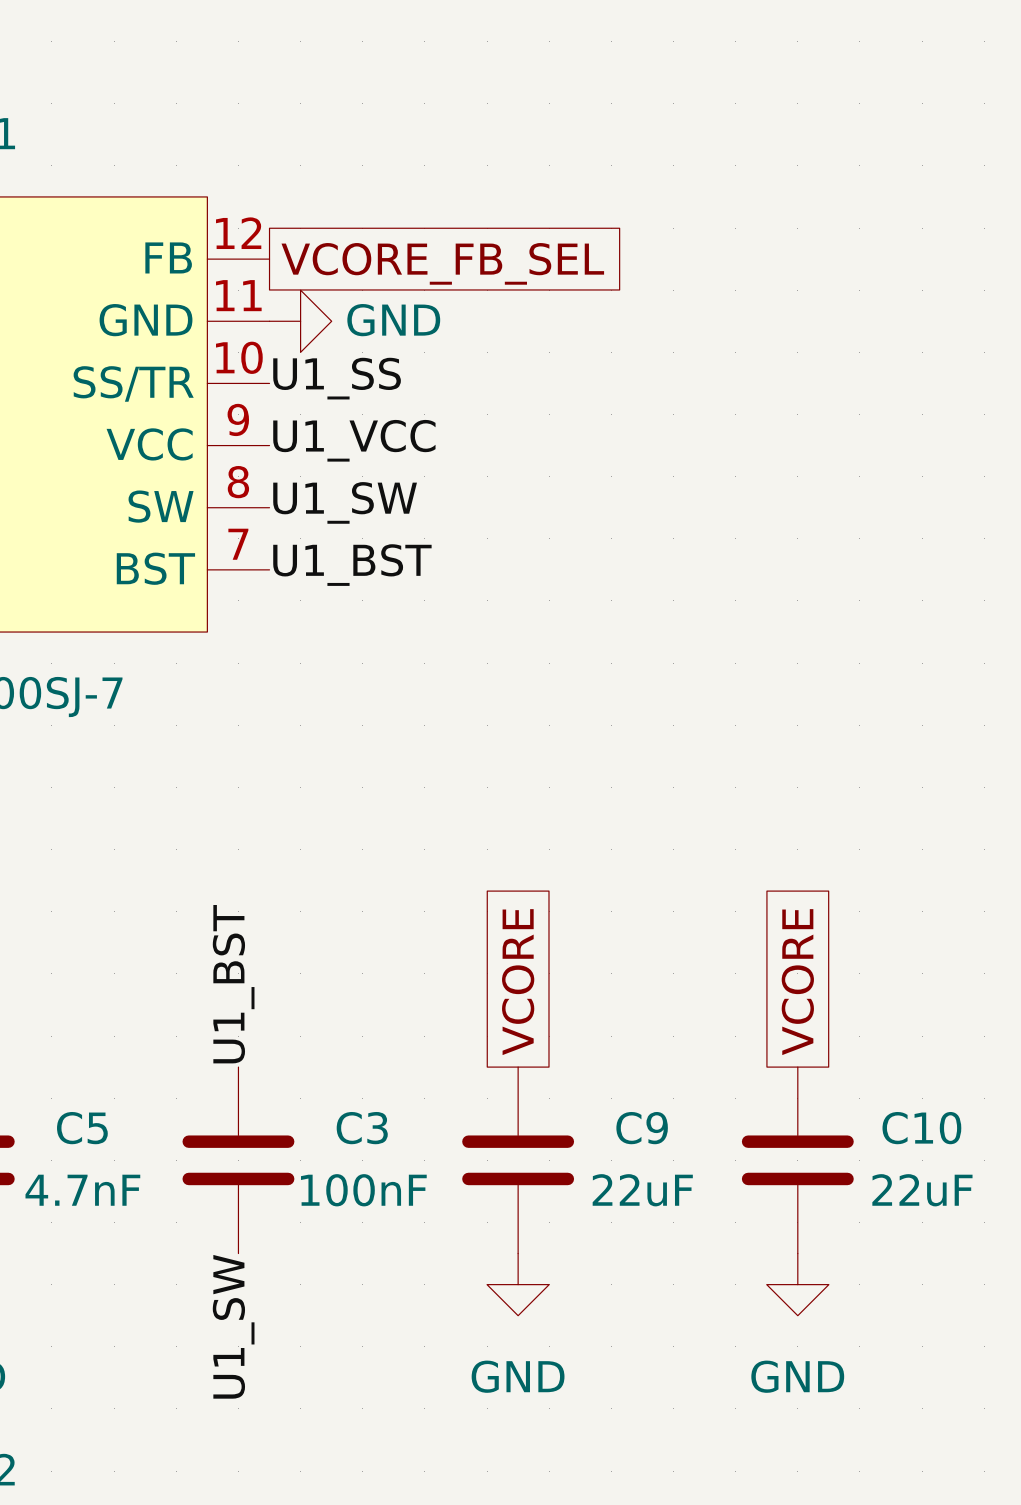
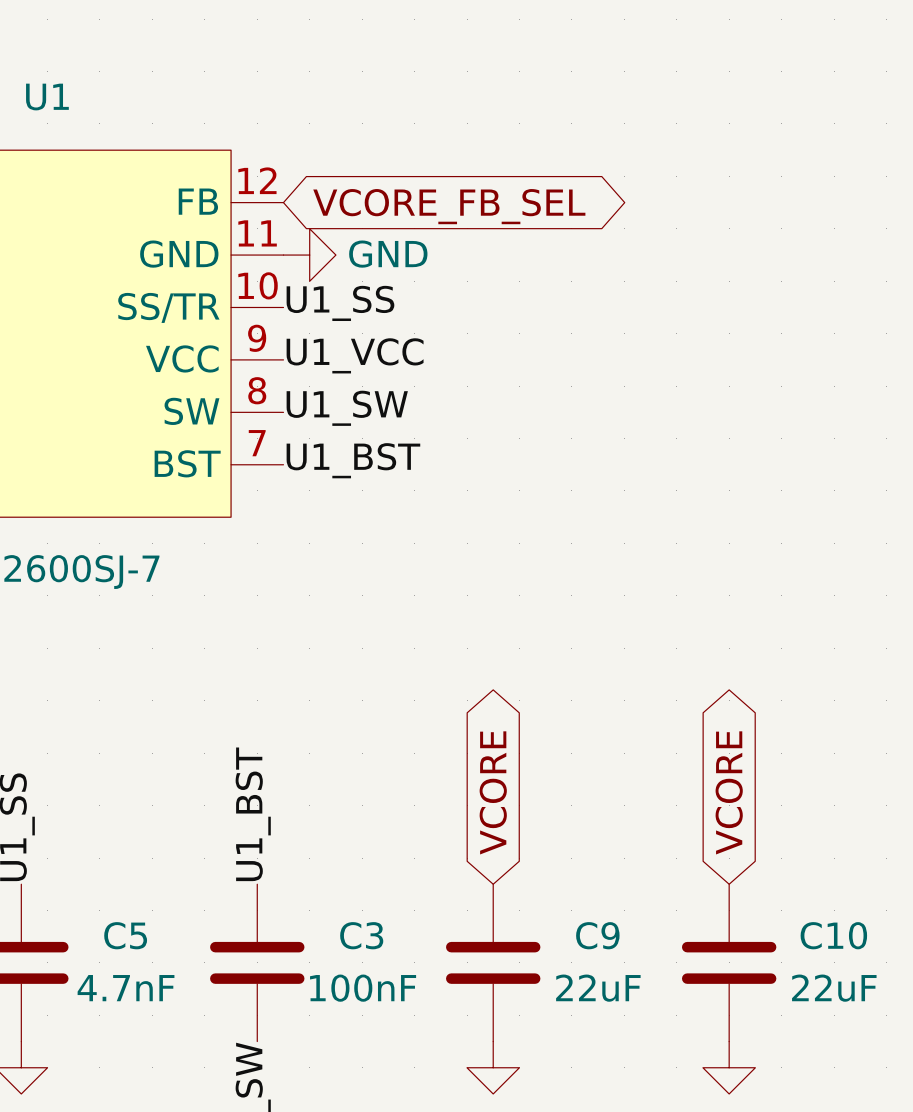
global label shape: passive (442, 263) -> bidirectional (449, 206)
global label shape: passive (518, 982) -> bidirectional (493, 792)
global label shape: passive (797, 982) -> bidirectional (729, 792)

